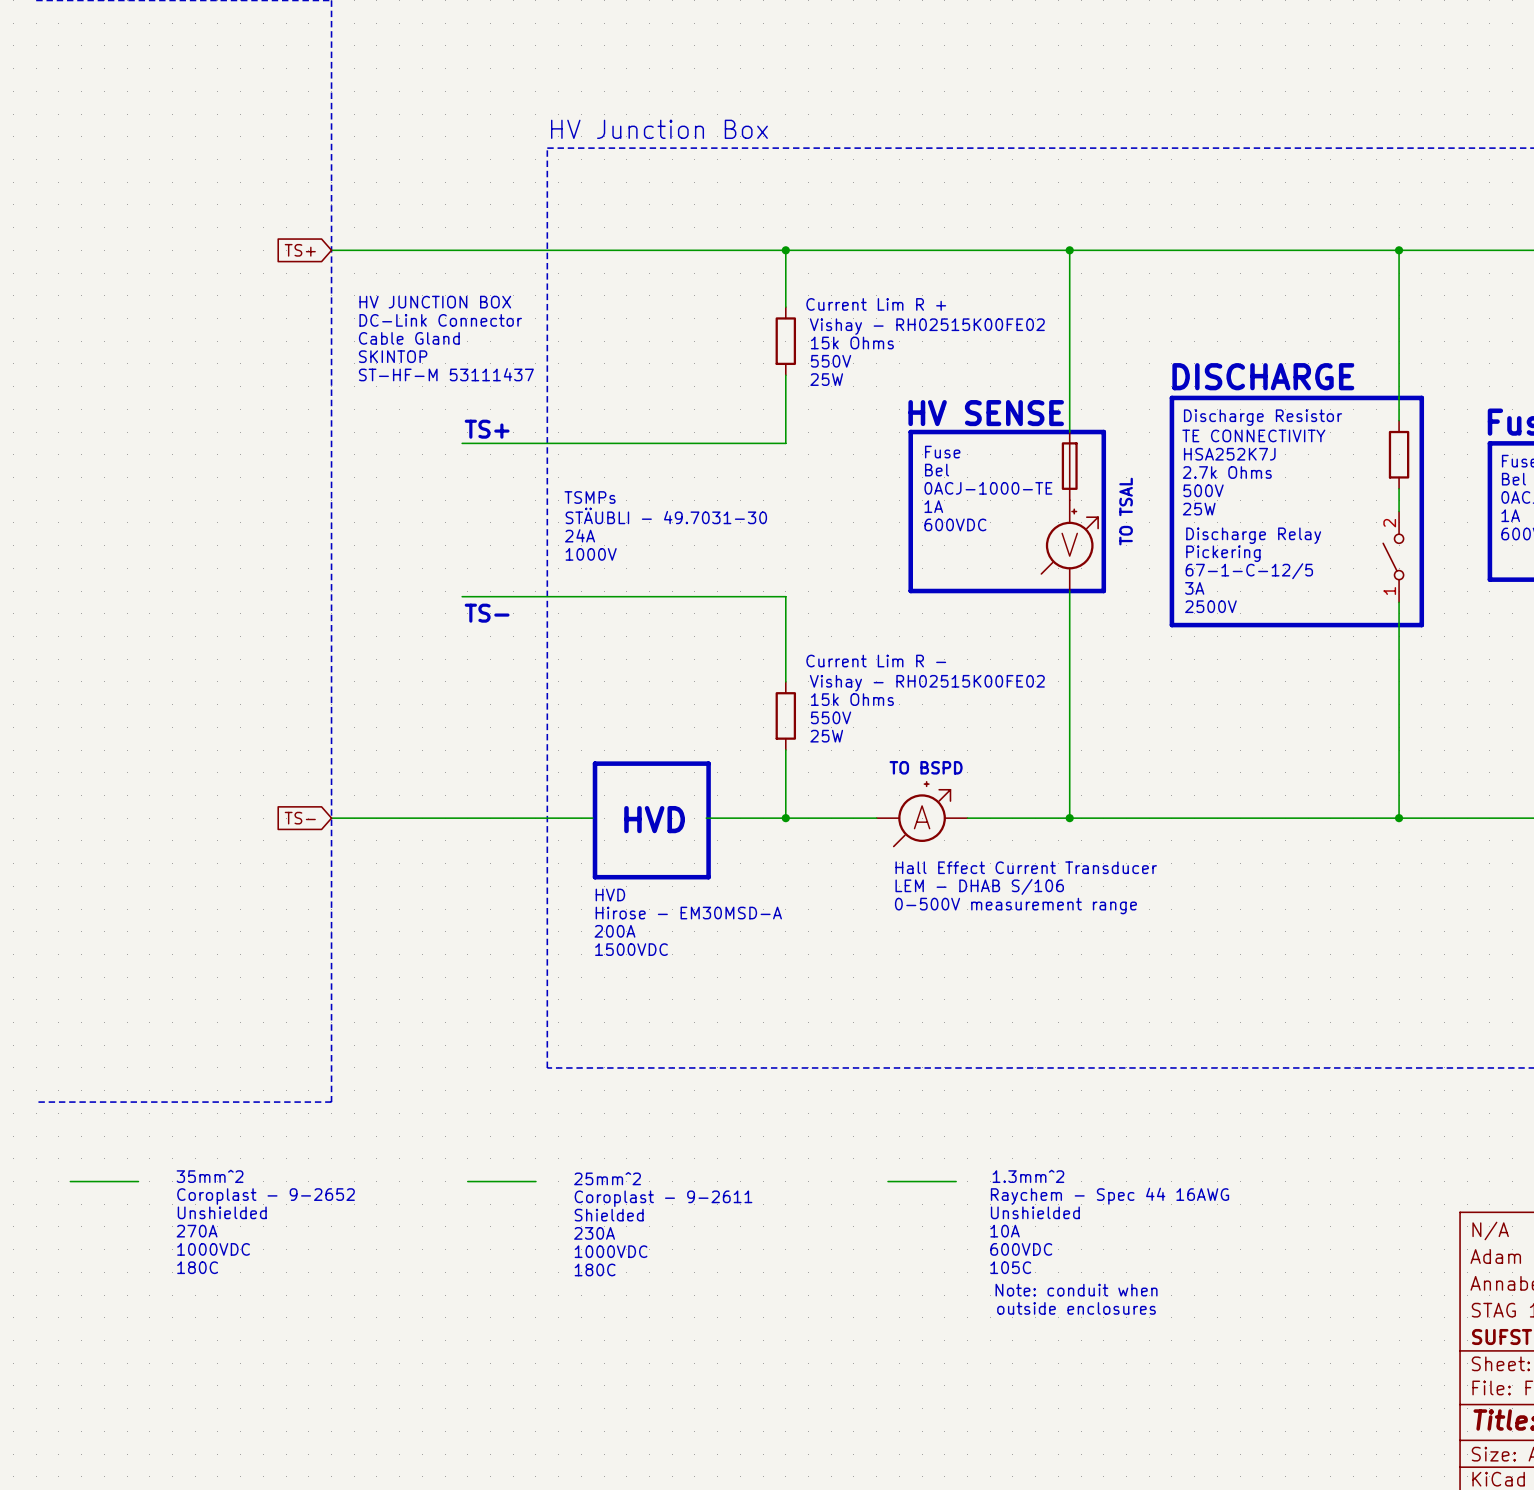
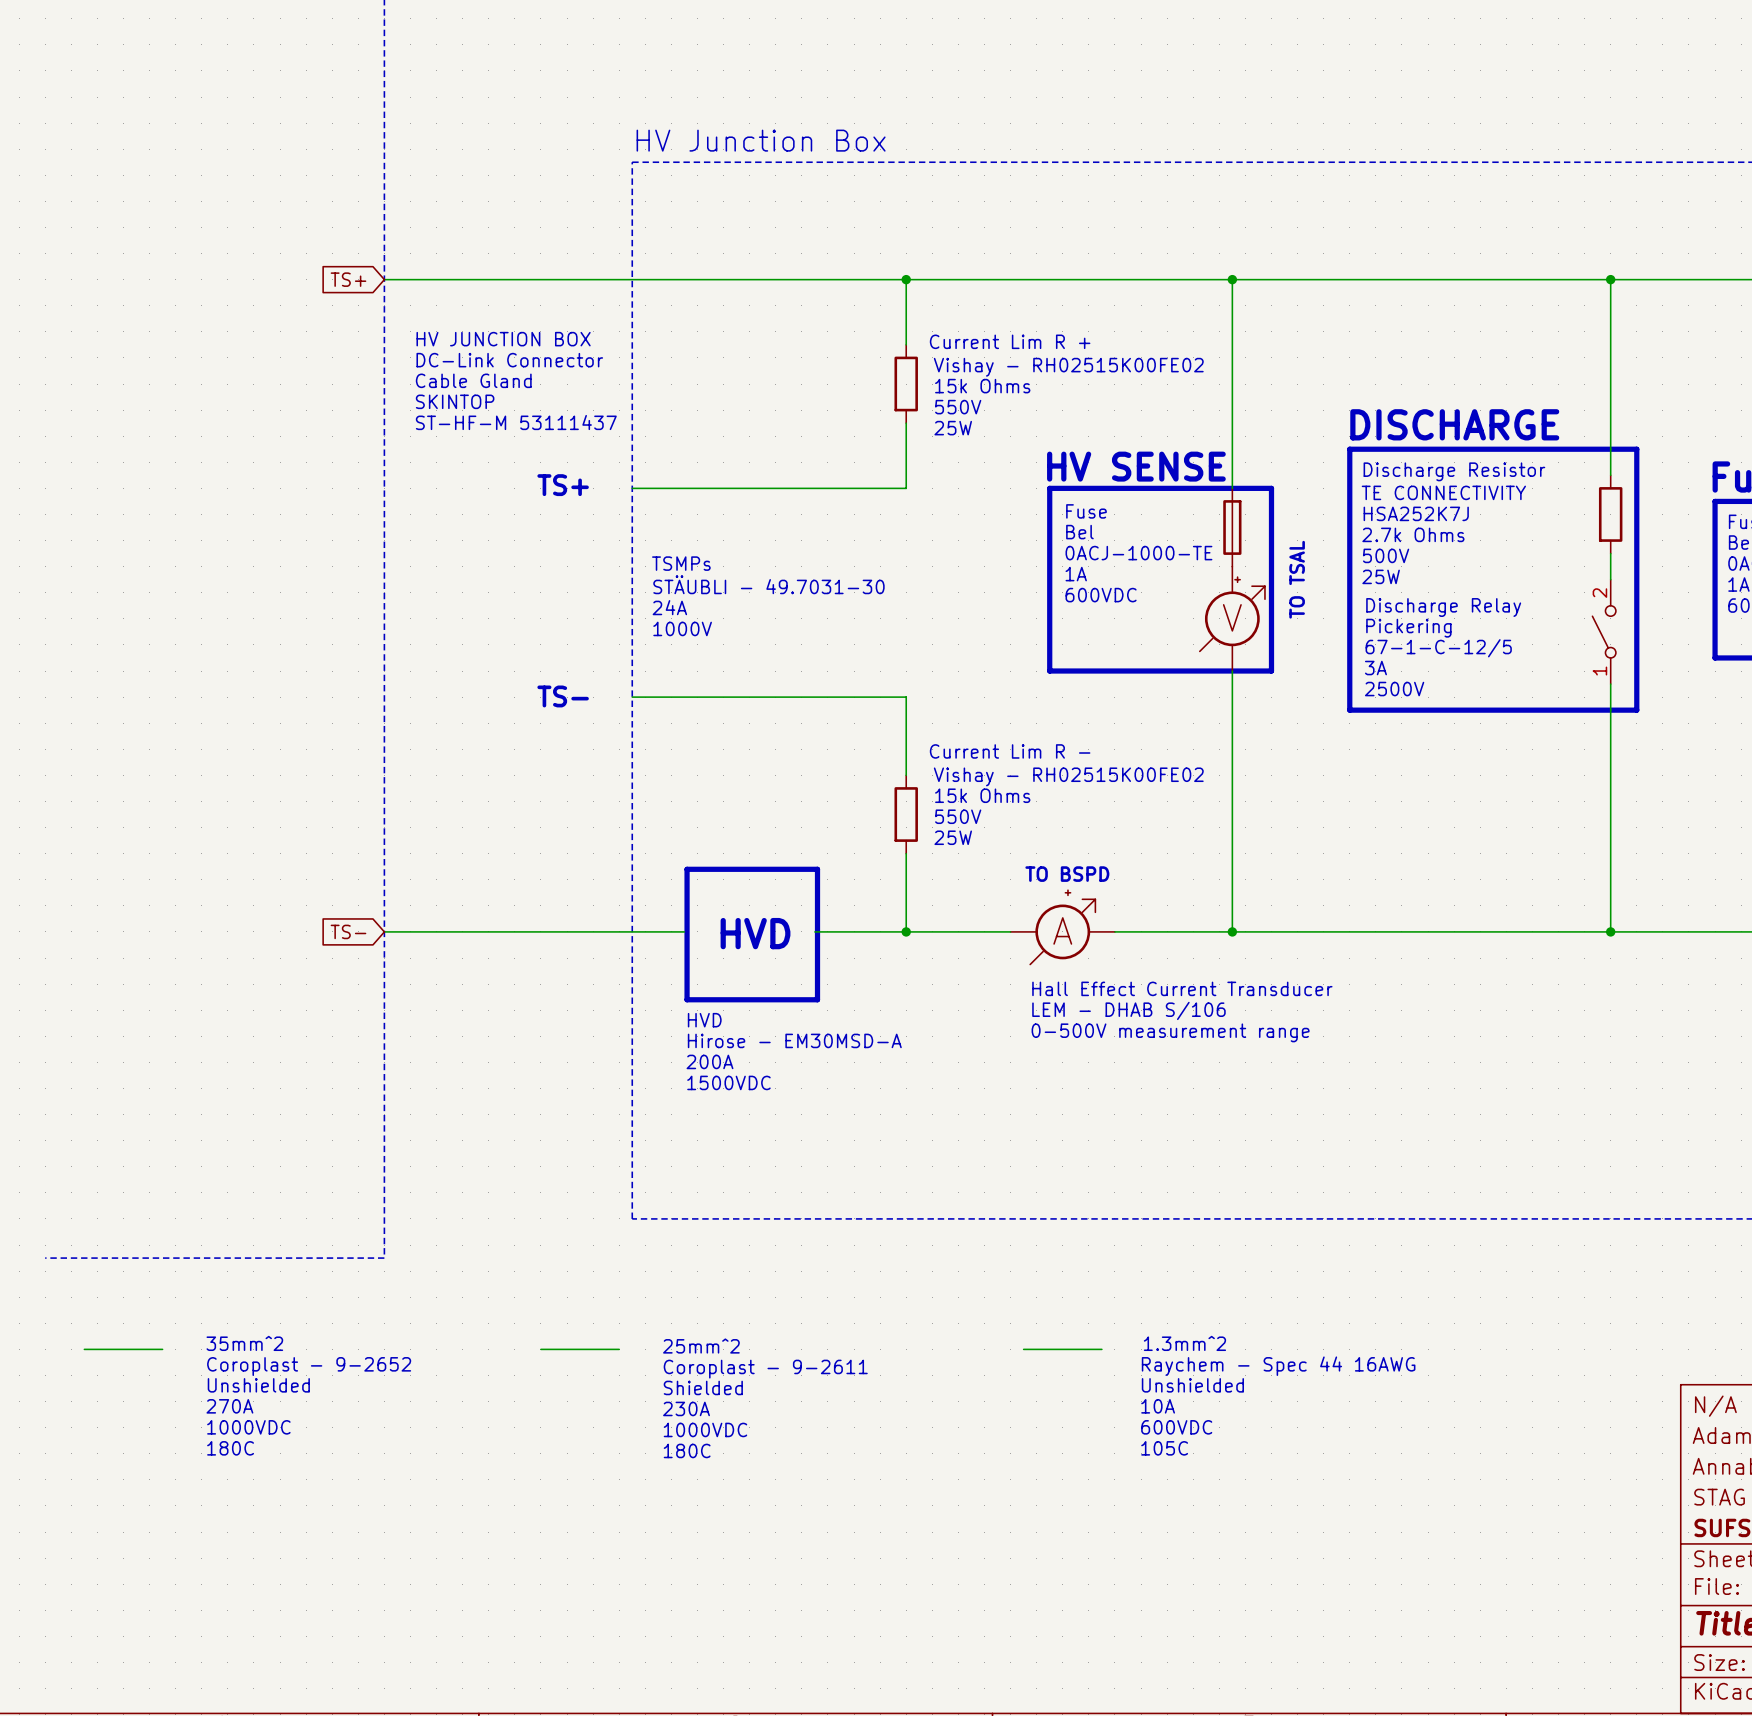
wire: (785, 432) (785, 443) (462, 443) -> (906, 488) (632, 488)
wire: (462, 596) (785, 596) (785, 613) -> (632, 697) (906, 697)
text: Note: conduit when (1076, 1290) -> none
text: outside enclosures (1076, 1308) -> none

